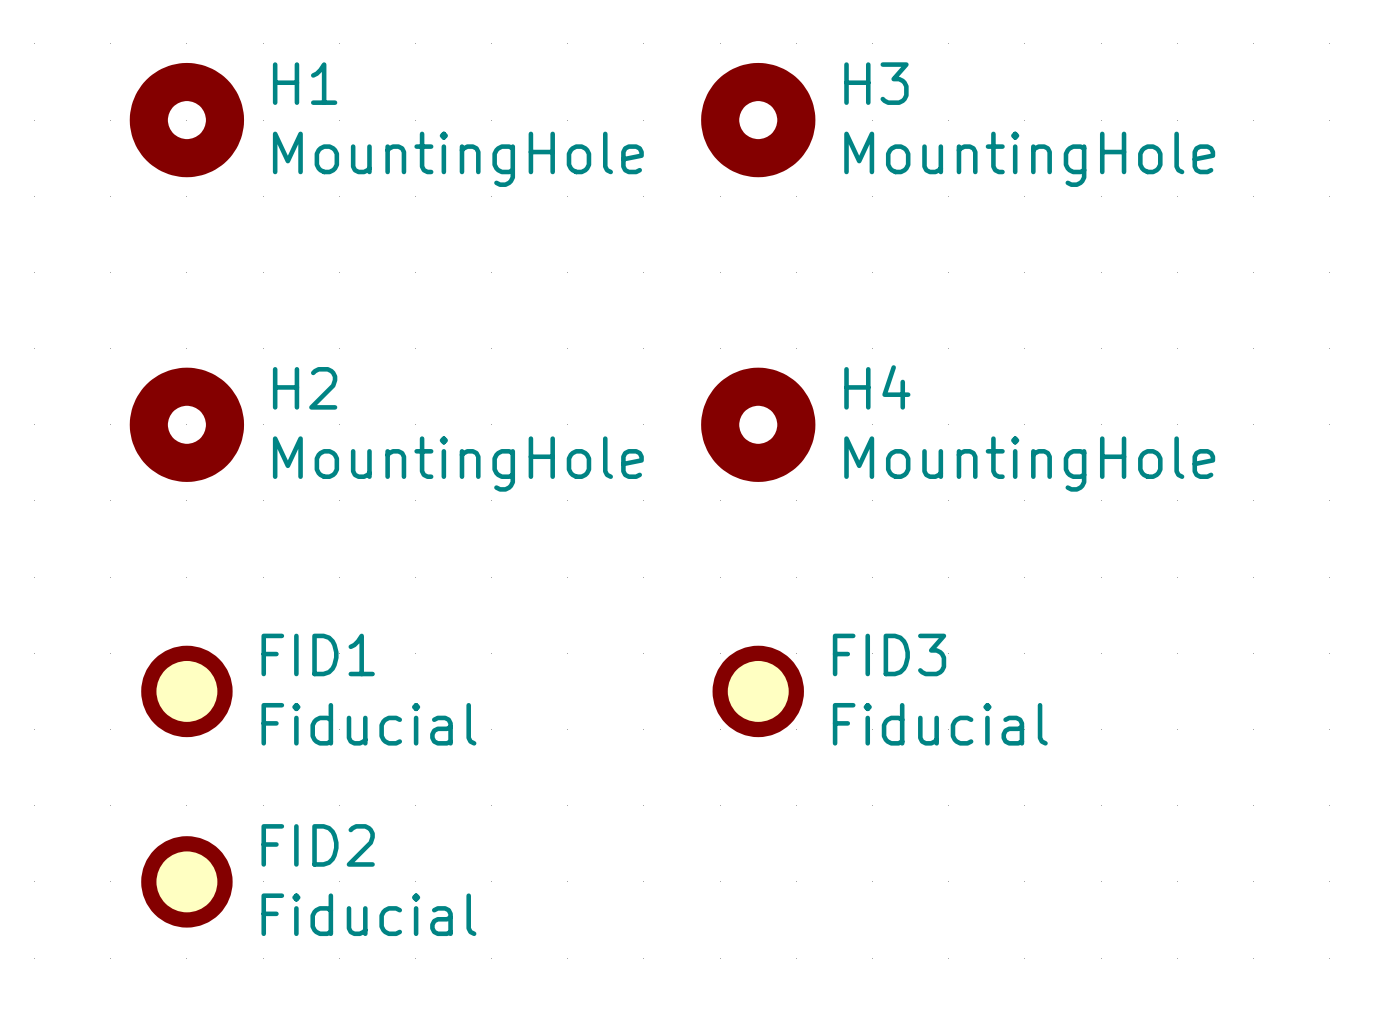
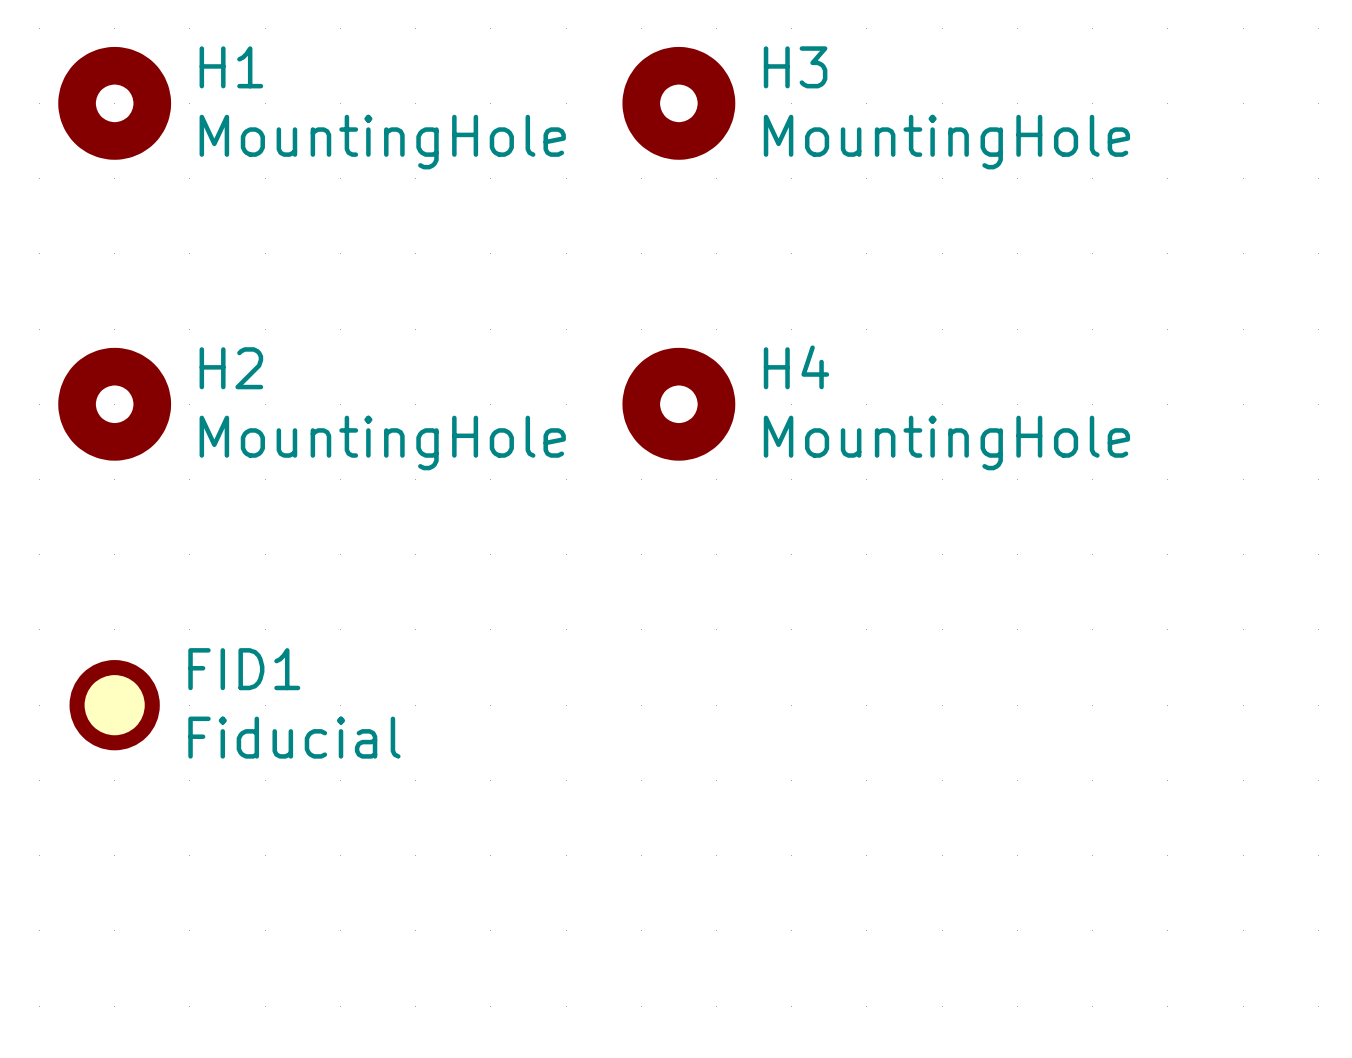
FID1 position: (186, 691) -> (114, 705)
FID3: Fiducial (758, 691) -> none
FID2: Fiducial (186, 881) -> none

